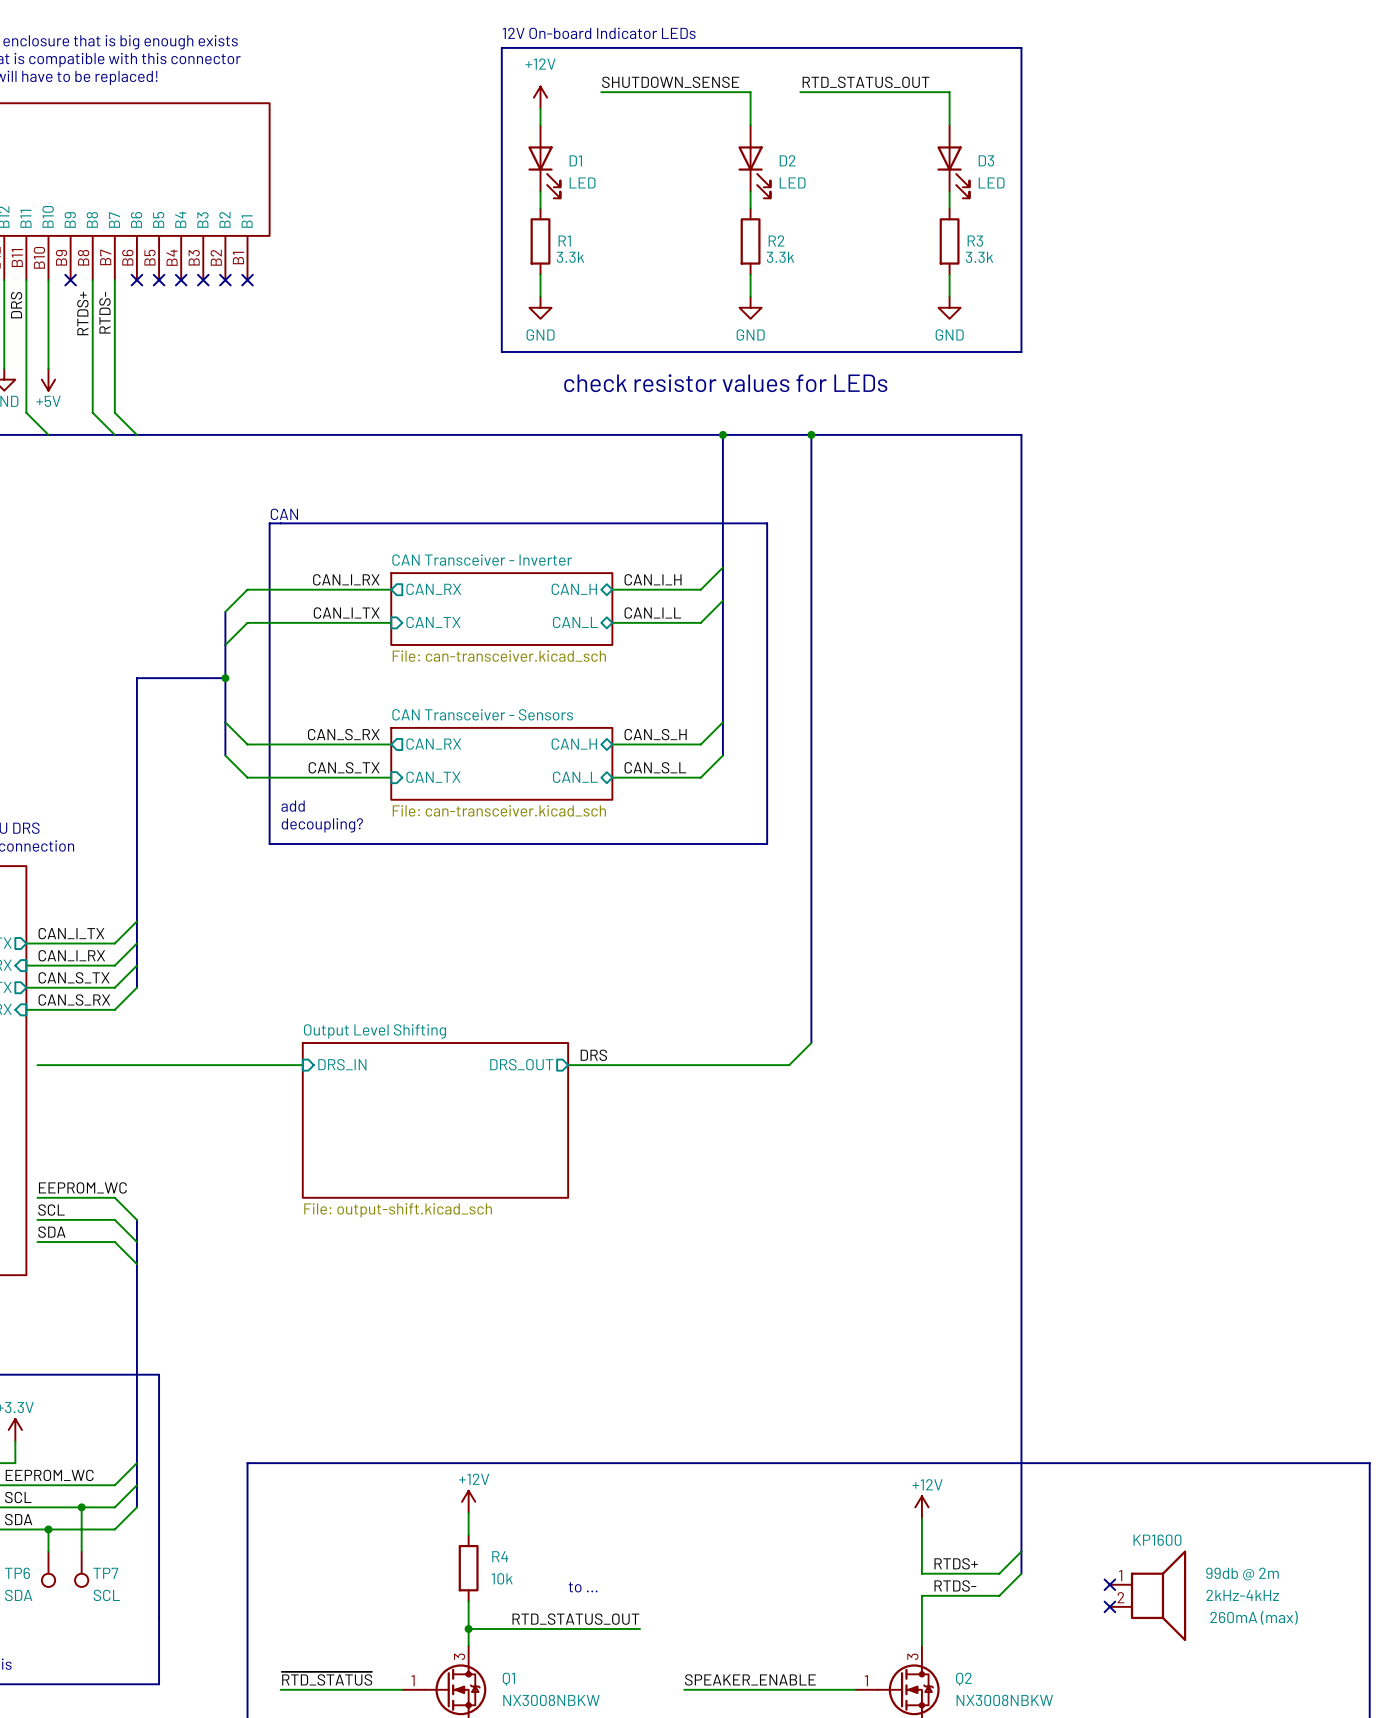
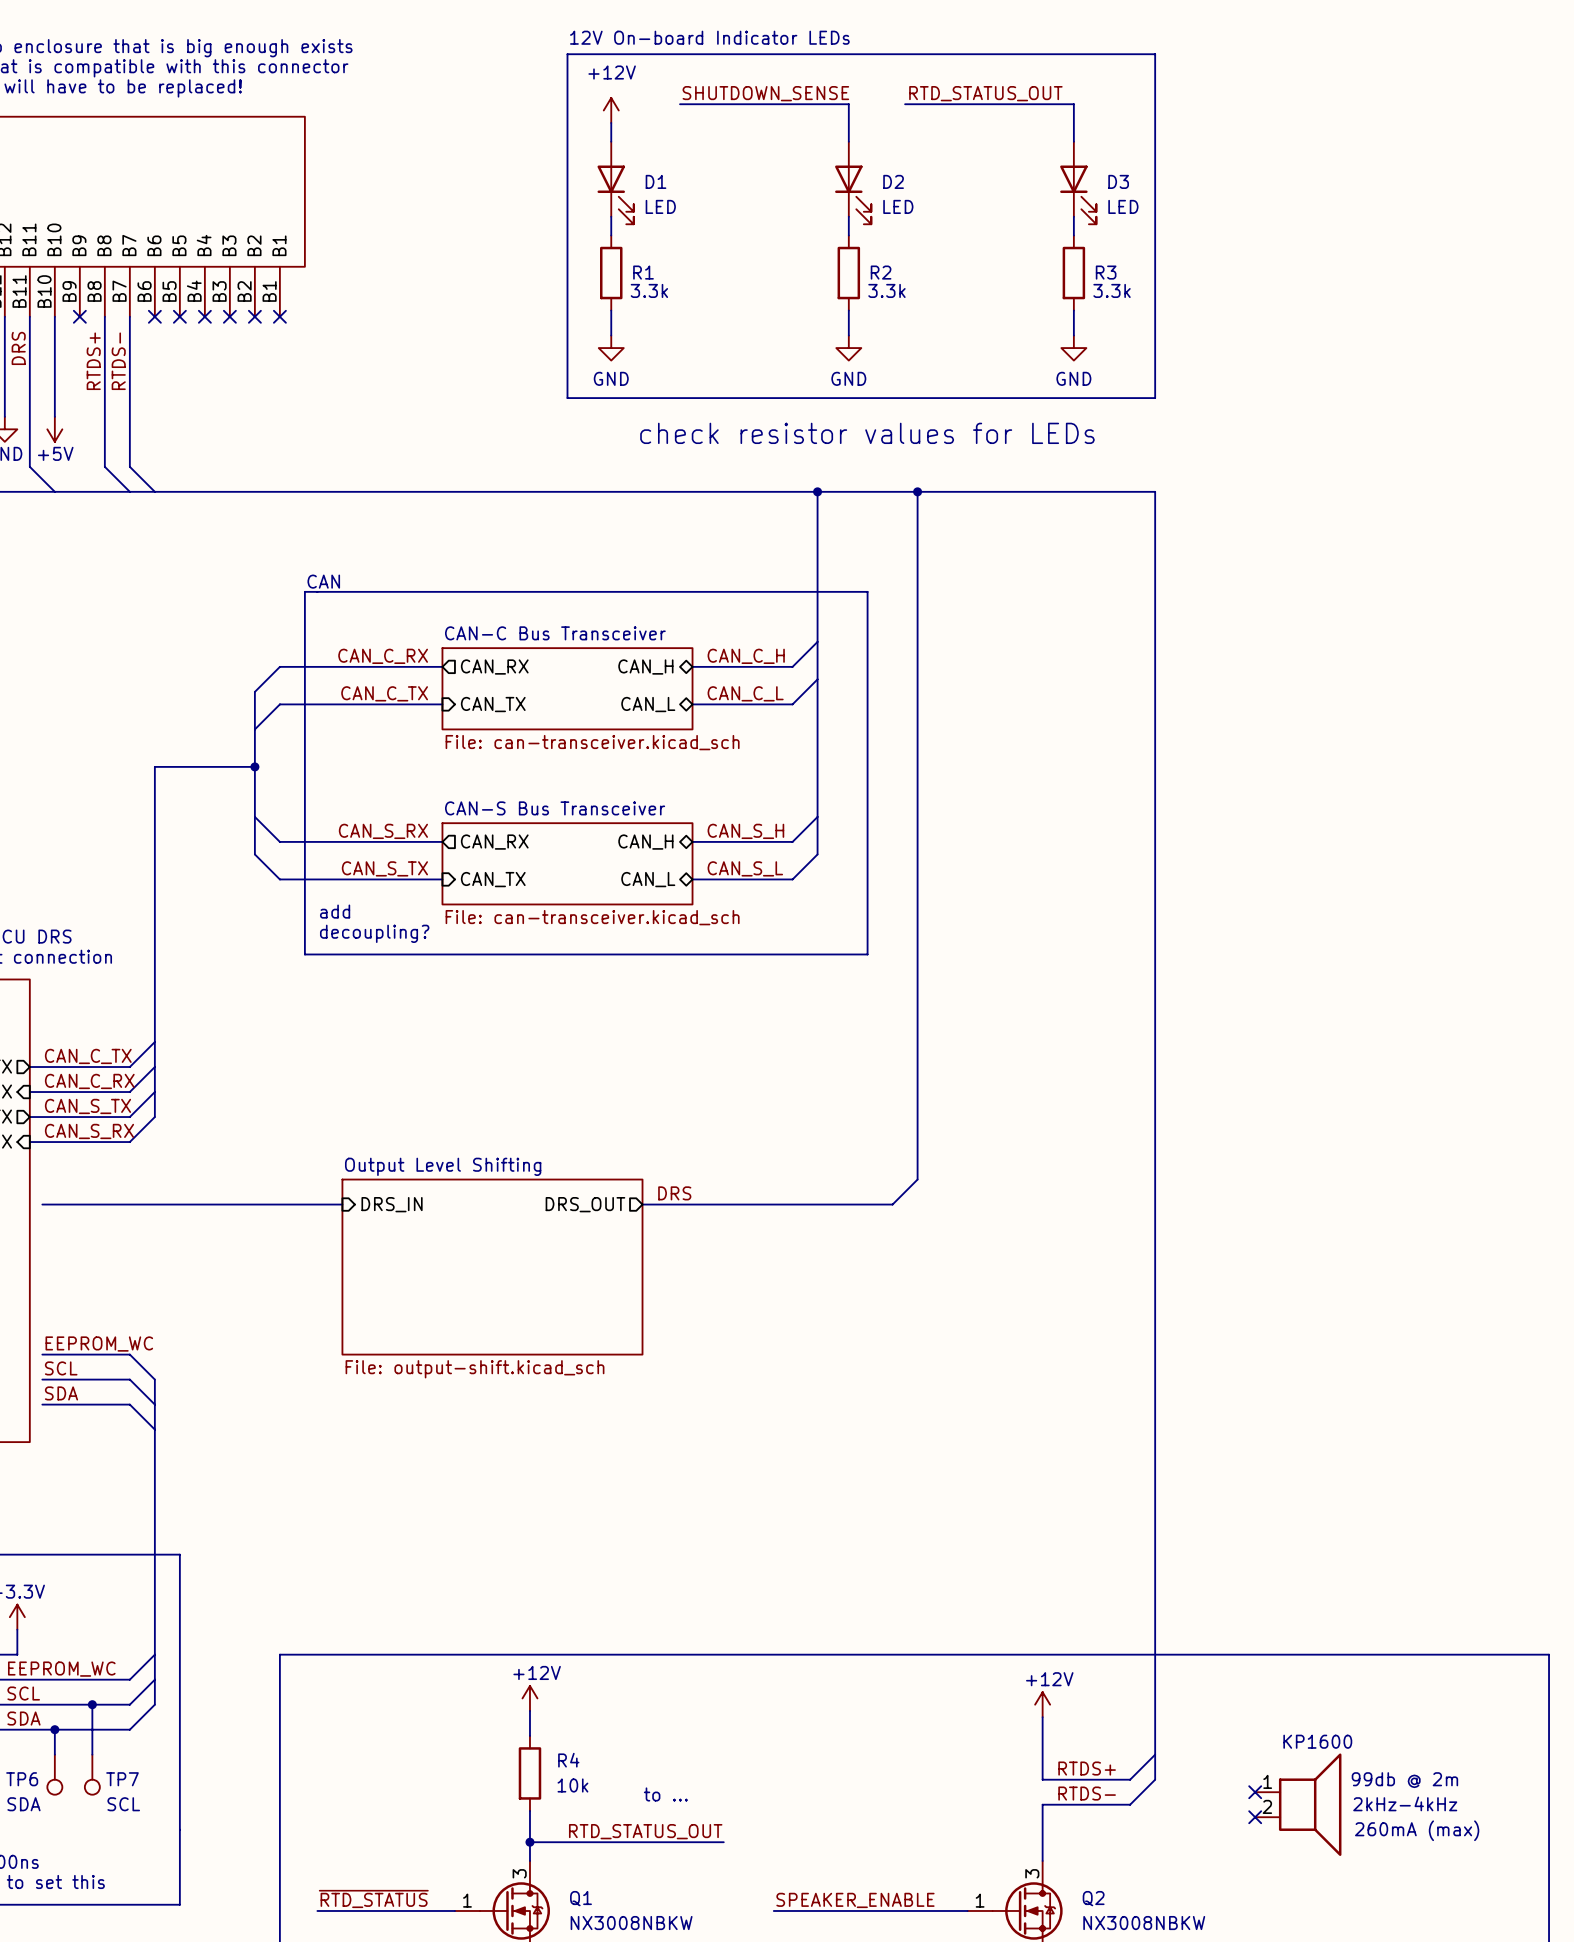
sheet CAN Transceiver - Inverter name: CAN Transceiver - Inverter (482, 560) -> CAN-C Bus Transceiver (555, 633)
label: CAN_I_RX (346, 579) -> CAN_C_RX (383, 656)
label: CAN_I_H (653, 579) -> CAN_C_H (746, 656)
label: CAN_I_TX (346, 613) -> CAN_C_TX (384, 693)
label: CAN_I_L (652, 613) -> CAN_C_L (745, 693)
sheet CAN Transceiver - Sensors name: CAN Transceiver - Sensors (482, 714) -> CAN-S Bus Transceiver (555, 808)
label: CAN_I_TX (71, 933) -> CAN_C_TX (88, 1056)
label: CAN_I_RX (71, 955) -> CAN_C_RX (89, 1081)

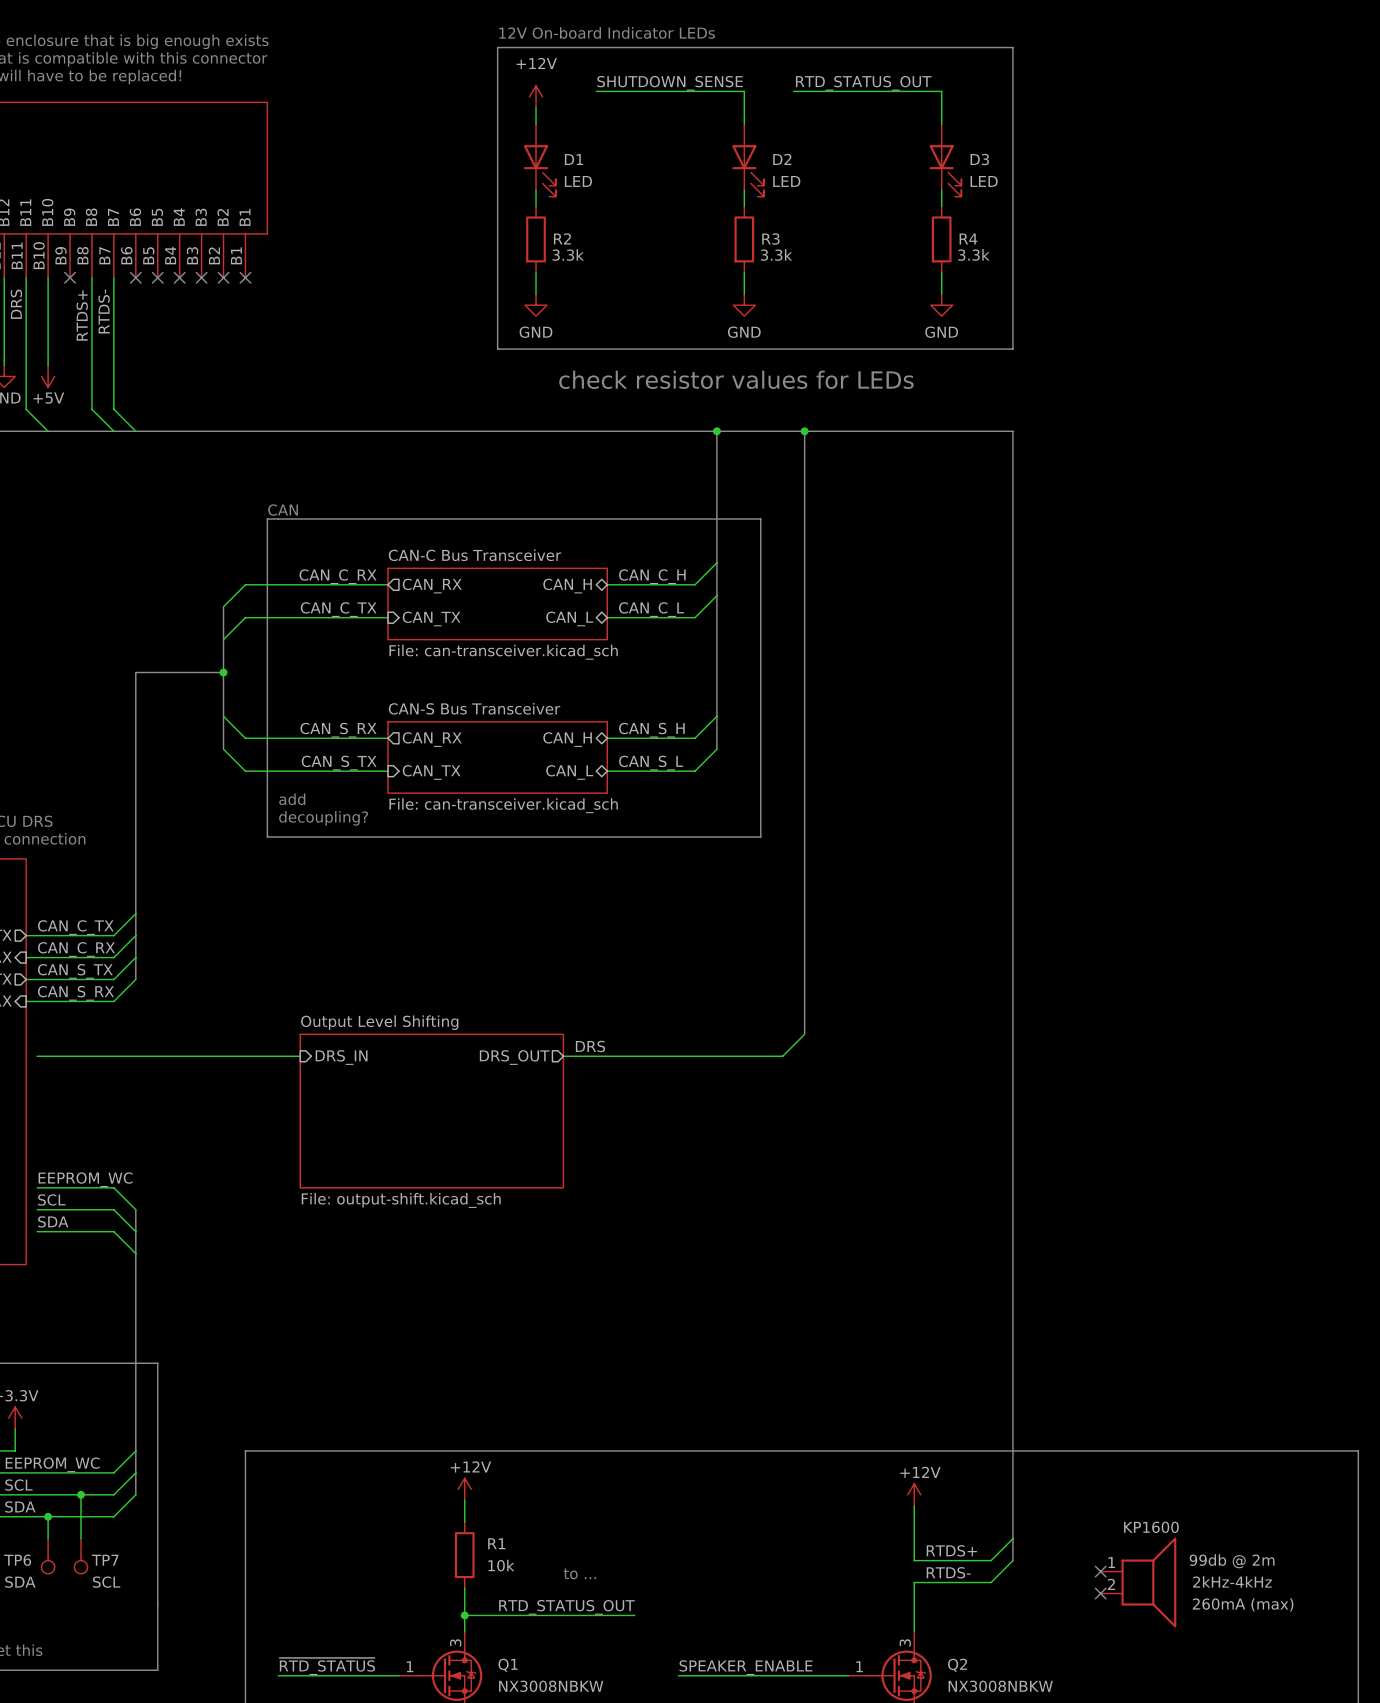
R1 name: R1 (643, 272) -> R2 (562, 238)
R2 name: R2 (881, 272) -> R3 (770, 239)
R3 name: R3 (1106, 272) -> R4 (968, 239)
R4 name: R4 (568, 1760) -> R1 (496, 1543)

